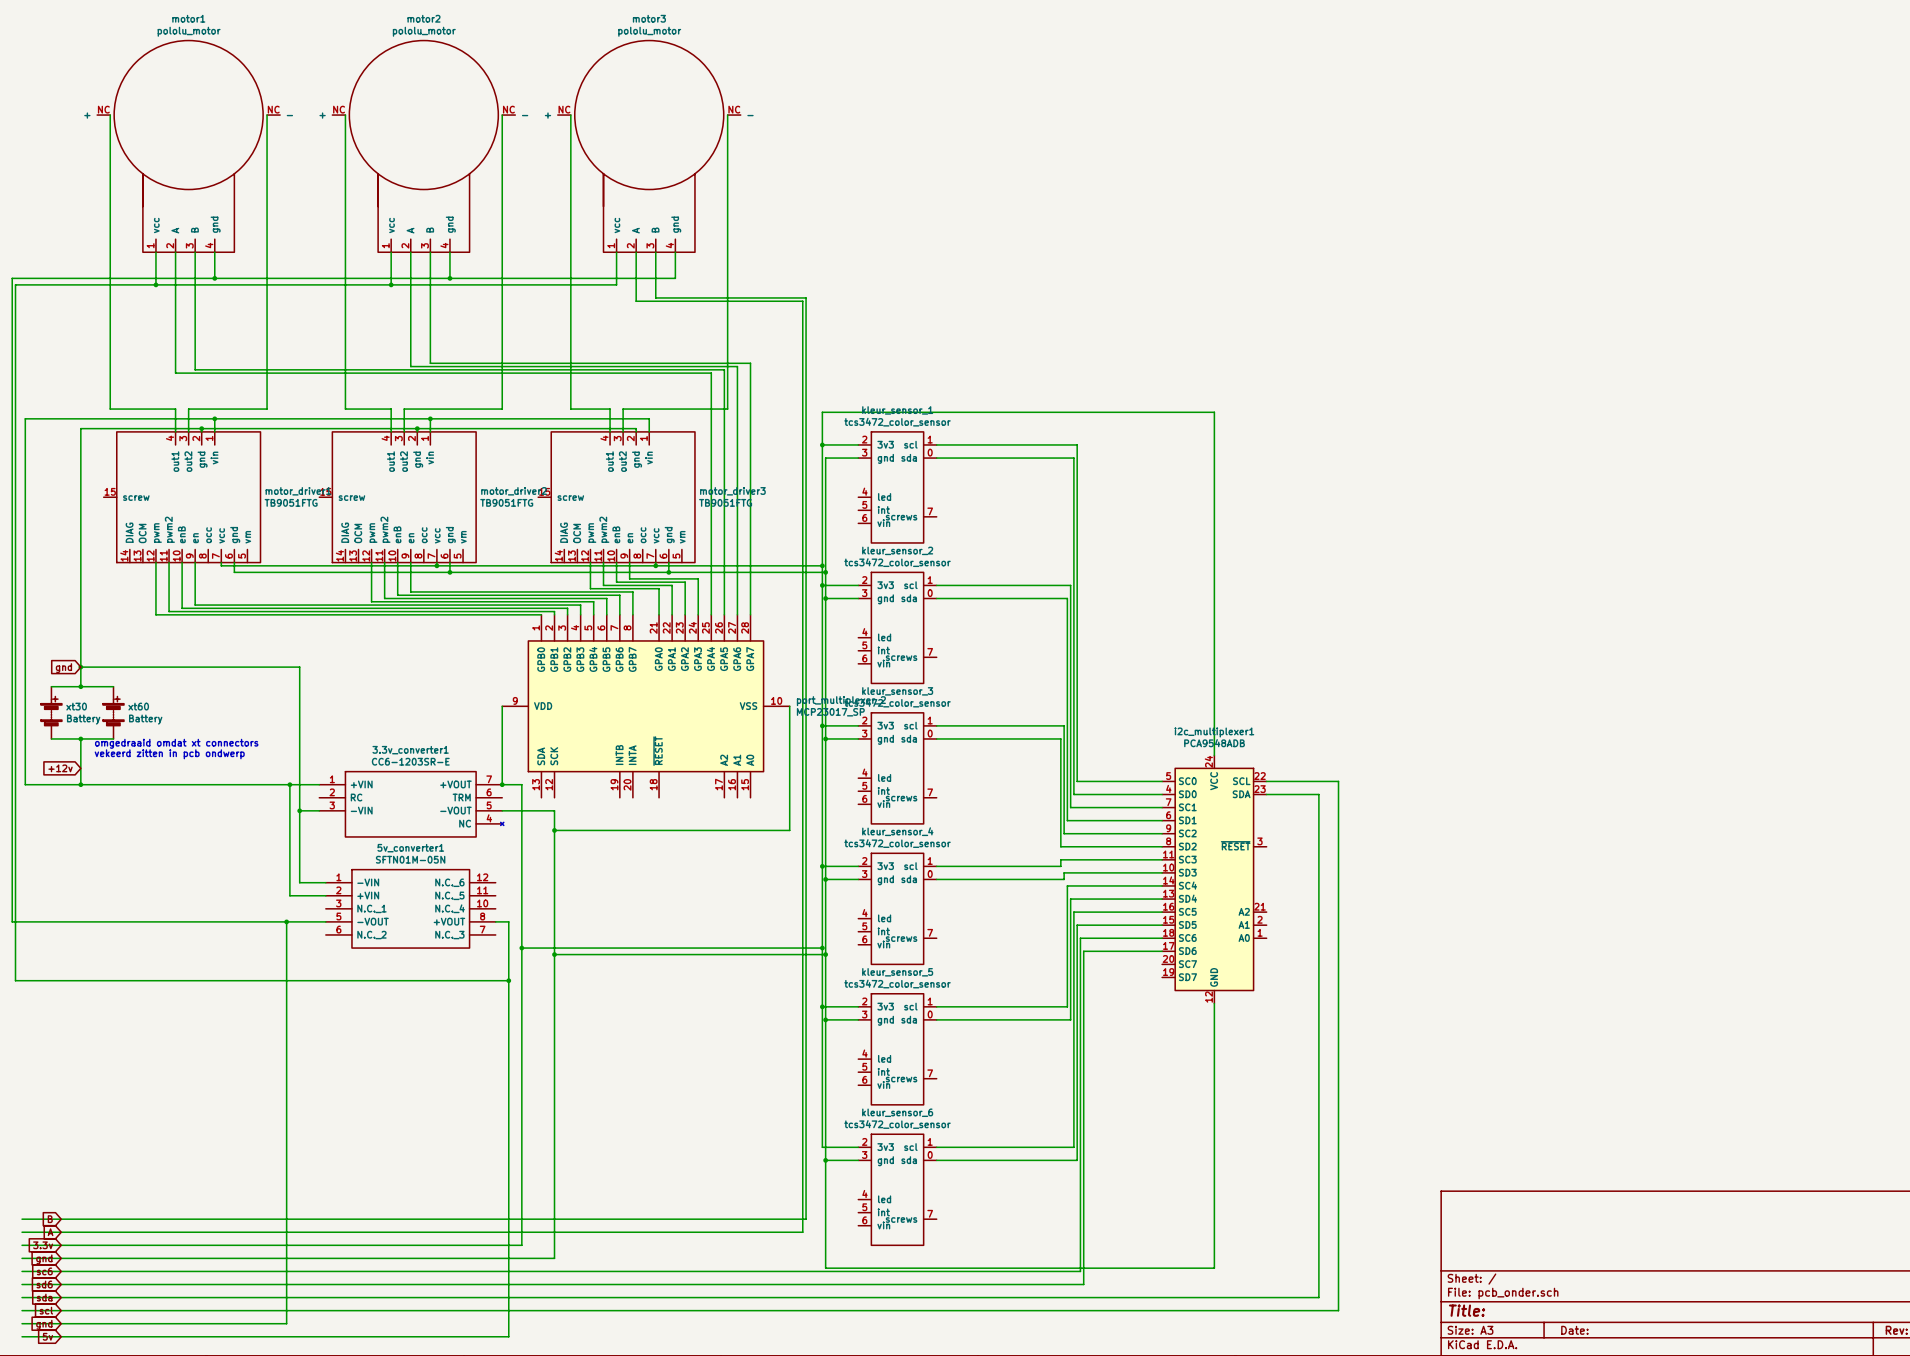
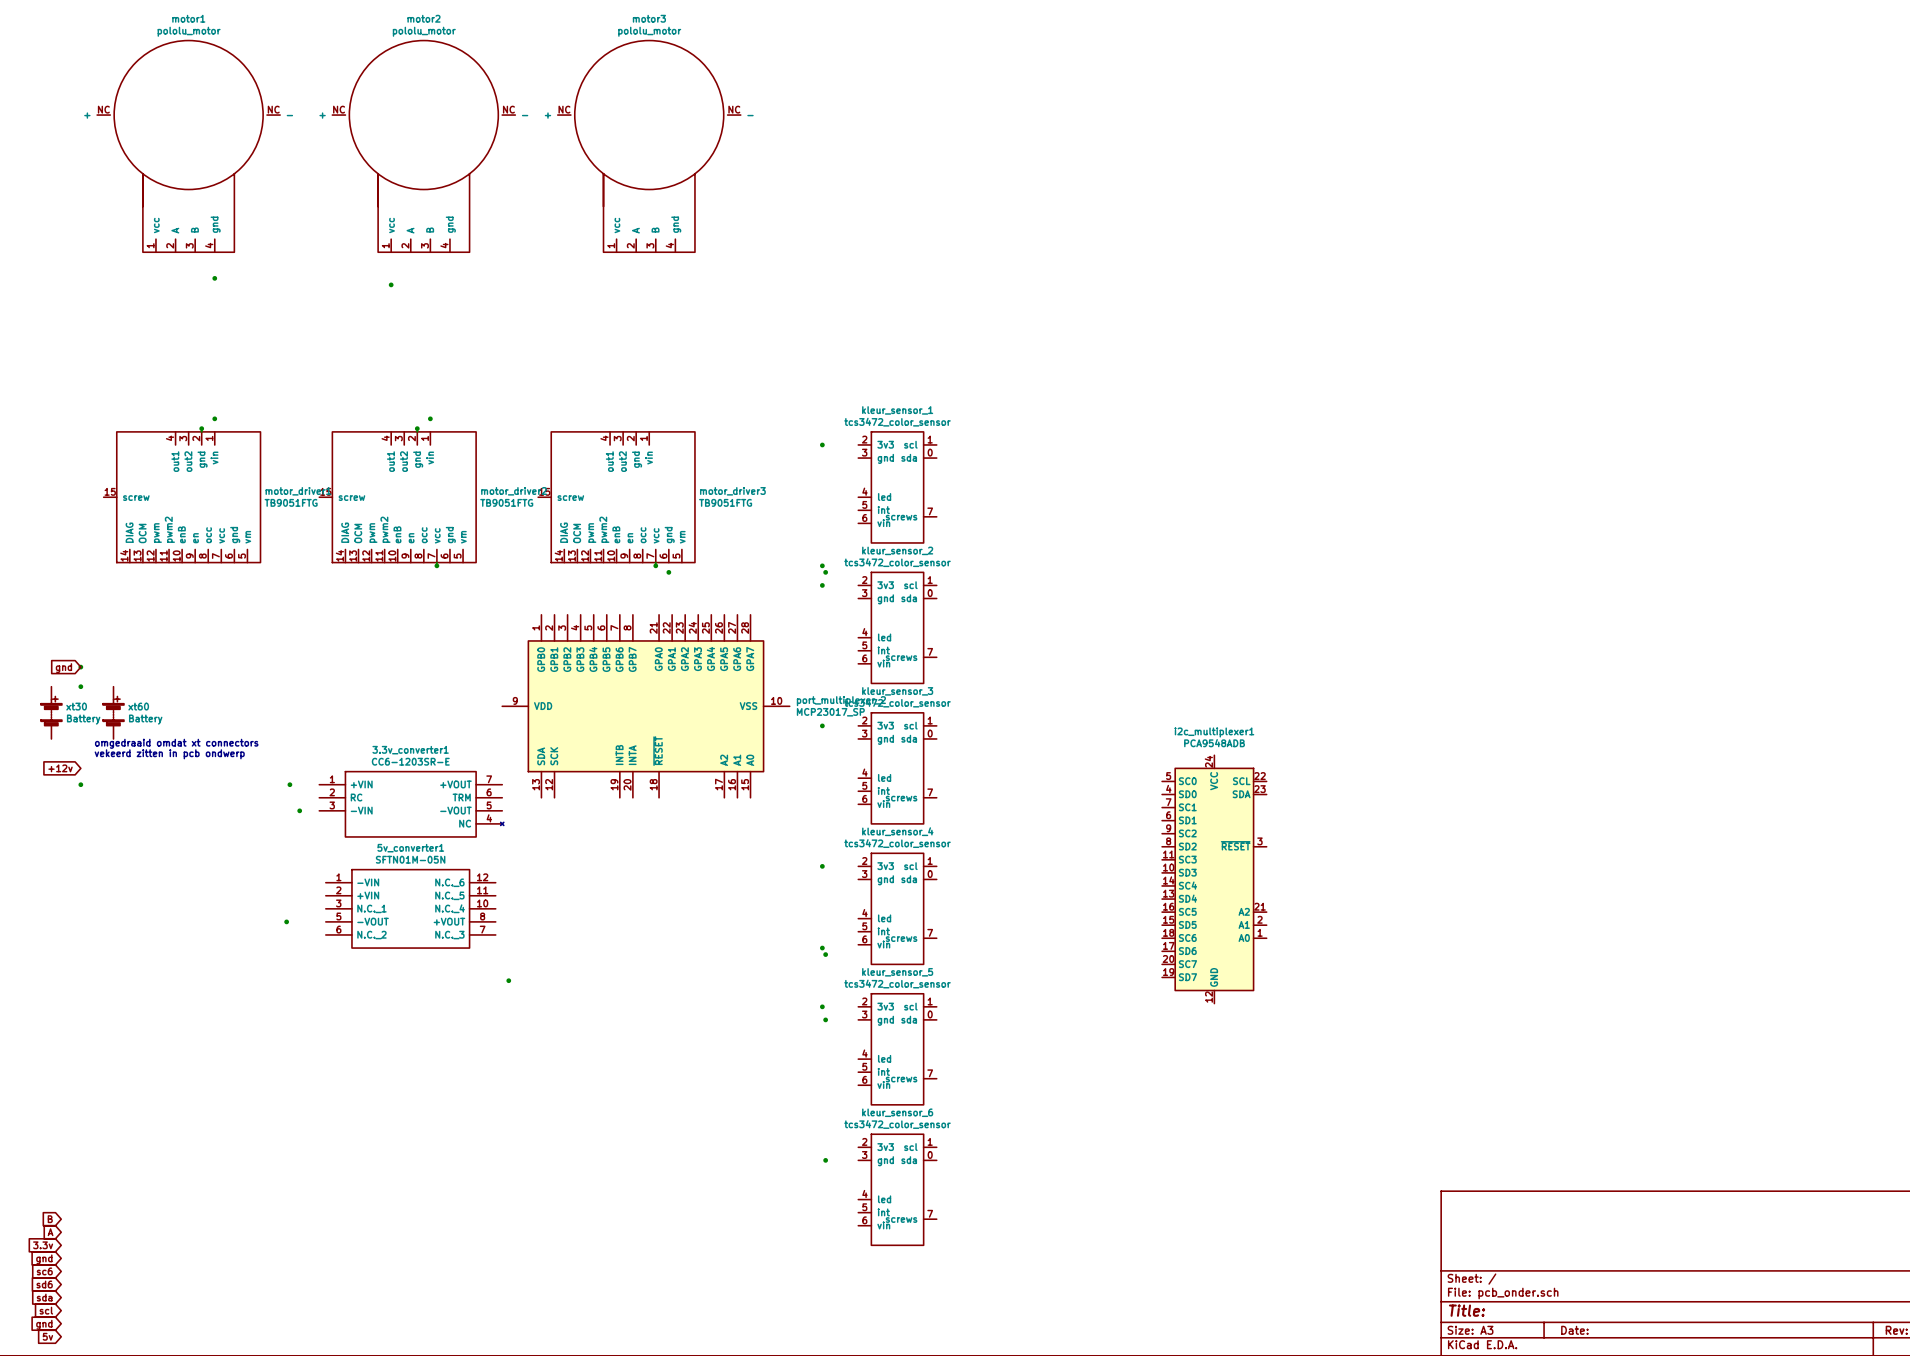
wire: (110, 115) (110, 409) (175, 409) (175, 431) -> none
wire: (267, 115) (267, 409) (188, 409) (188, 431) -> none
wire: (345, 115) (345, 409) (391, 409) (391, 431) -> none
wire: (502, 115) (502, 409) (404, 409) (404, 431) -> none
wire: (570, 115) (570, 409) (610, 409) (610, 431) -> none
wire: (727, 115) (727, 409) (623, 409) (623, 431) -> none
wire: (155, 252) (155, 284) -> none
wire: (175, 252) (175, 373) (711, 373) (711, 614) -> none
wire: (195, 252) (195, 369) (724, 369) (724, 614) -> none
wire: (214, 252) (214, 278) -> none
wire: (391, 252) (391, 284) -> none
wire: (410, 252) (410, 366) (737, 366) (737, 614) -> none
wire: (430, 252) (430, 363) (750, 363) (750, 614) -> none
wire: (449, 252) (449, 278) -> none
wire: (616, 252) (616, 284) (15, 284) (15, 980) (508, 980) -> none
wire: (636, 252) (636, 301) (802, 301) (802, 1232) (22, 1232) -> none
wire: (655, 252) (655, 297) (806, 297) (806, 1219) (22, 1219) -> none
wire: (675, 252) (675, 278) (12, 278) (12, 921) (325, 921) -> none
junction: (449, 278) -> none
junction: (155, 284) -> none
wire: (214, 418) (214, 431) -> none
wire: (430, 418) (430, 431) -> none
wire: (636, 431) (636, 428) (80, 428) (80, 686) -> none
wire: (649, 431) (649, 418) (25, 418) (25, 784) (319, 784) -> none
wire: (822, 444) (858, 444) -> none
wire: (936, 444) (1077, 444) (1077, 781) (1162, 781) -> none
wire: (858, 458) (825, 458) (825, 1268) (1214, 1268) (1214, 1003) -> none
wire: (936, 458) (1073, 458) (1073, 794) (1162, 794) -> none
wire: (155, 562) (155, 614) (541, 614) -> none
wire: (169, 562) (169, 611) (554, 611) (554, 614) -> none
wire: (182, 562) (182, 608) (567, 608) (567, 614) -> none
wire: (195, 562) (195, 605) (580, 605) (580, 614) -> none
wire: (221, 562) (221, 565) (822, 565) -> none
wire: (234, 562) (234, 572) (825, 572) -> none
wire: (371, 562) (371, 601) (593, 601) (593, 614) -> none
wire: (384, 562) (384, 598) (606, 598) (606, 614) -> none
wire: (397, 562) (397, 595) (619, 595) (619, 614) -> none
wire: (410, 562) (410, 591) (632, 591) (632, 614) -> none
wire: (449, 562) (449, 572) -> none
wire: (590, 562) (590, 588) (659, 588) (659, 614) -> none
wire: (603, 562) (603, 585) (672, 585) (672, 614) -> none
wire: (616, 562) (616, 582) (685, 582) (685, 614) -> none
wire: (629, 562) (629, 578) (698, 578) (698, 614) -> none
wire: (668, 562) (668, 572) -> none
junction: (449, 572) -> none
wire: (822, 585) (858, 585) -> none
wire: (936, 585) (1070, 585) (1070, 807) (1162, 807) -> none
wire: (825, 598) (858, 598) -> none
junction: (825, 598) -> none
wire: (936, 598) (1067, 598) (1067, 820) (1162, 820) -> none
wire: (80, 667) (299, 667) (299, 882) (325, 882) -> none
wire: (51, 686) (113, 686) -> none
wire: (502, 706) (502, 784) (521, 784) (521, 1245) (22, 1245) -> none
wire: (789, 706) (789, 830) (554, 830) -> none
wire: (822, 725) (858, 725) -> none
wire: (936, 725) (1064, 725) (1064, 833) (1162, 833) -> none
wire: (51, 738) (113, 738) -> none
wire: (80, 738) (80, 784) -> none
junction: (80, 738) -> none
wire: (825, 738) (858, 738) -> none
junction: (825, 738) -> none
wire: (936, 738) (1060, 738) (1060, 846) (1162, 846) -> none
wire: (1214, 755) (1214, 412) (822, 412) (822, 1147) (858, 1147) -> none
wire: (1266, 781) (1338, 781) (1338, 1310) (22, 1310) -> none
wire: (289, 784) (289, 895) (325, 895) -> none
junction: (502, 784) -> none
wire: (1266, 794) (1318, 794) (1318, 1297) (22, 1297) -> none
wire: (299, 810) (319, 810) -> none
wire: (502, 810) (554, 810) (554, 1258) (22, 1258) -> none
junction: (554, 830) -> none
wire: (1162, 859) (1060, 859) (1060, 866) (936, 866) -> none
wire: (822, 866) (858, 866) -> none
wire: (1162, 872) (1064, 872) (1064, 879) (936, 879) -> none
wire: (825, 879) (858, 879) -> none
junction: (825, 879) -> none
wire: (1162, 885) (1067, 885) (1067, 1006) (936, 1006) -> none
wire: (1162, 899) (1070, 899) (1070, 1019) (936, 1019) -> none
wire: (1162, 912) (1073, 912) (1073, 1147) (936, 1147) -> none
wire: (286, 921) (286, 1323) (22, 1323) -> none
wire: (495, 921) (508, 921) (508, 1336) (22, 1336) -> none
wire: (1162, 925) (1077, 925) (1077, 1160) (936, 1160) -> none
wire: (1162, 938) (1080, 938) (1080, 1271) (22, 1271) -> none
wire: (521, 948) (822, 948) -> none
junction: (521, 948) -> none
wire: (1162, 951) (1083, 951) (1083, 1284) (22, 1284) -> none
wire: (554, 954) (825, 954) -> none
junction: (554, 954) -> none
wire: (822, 1006) (858, 1006) -> none
wire: (825, 1019) (858, 1019) -> none
wire: (825, 1160) (858, 1160) -> none

